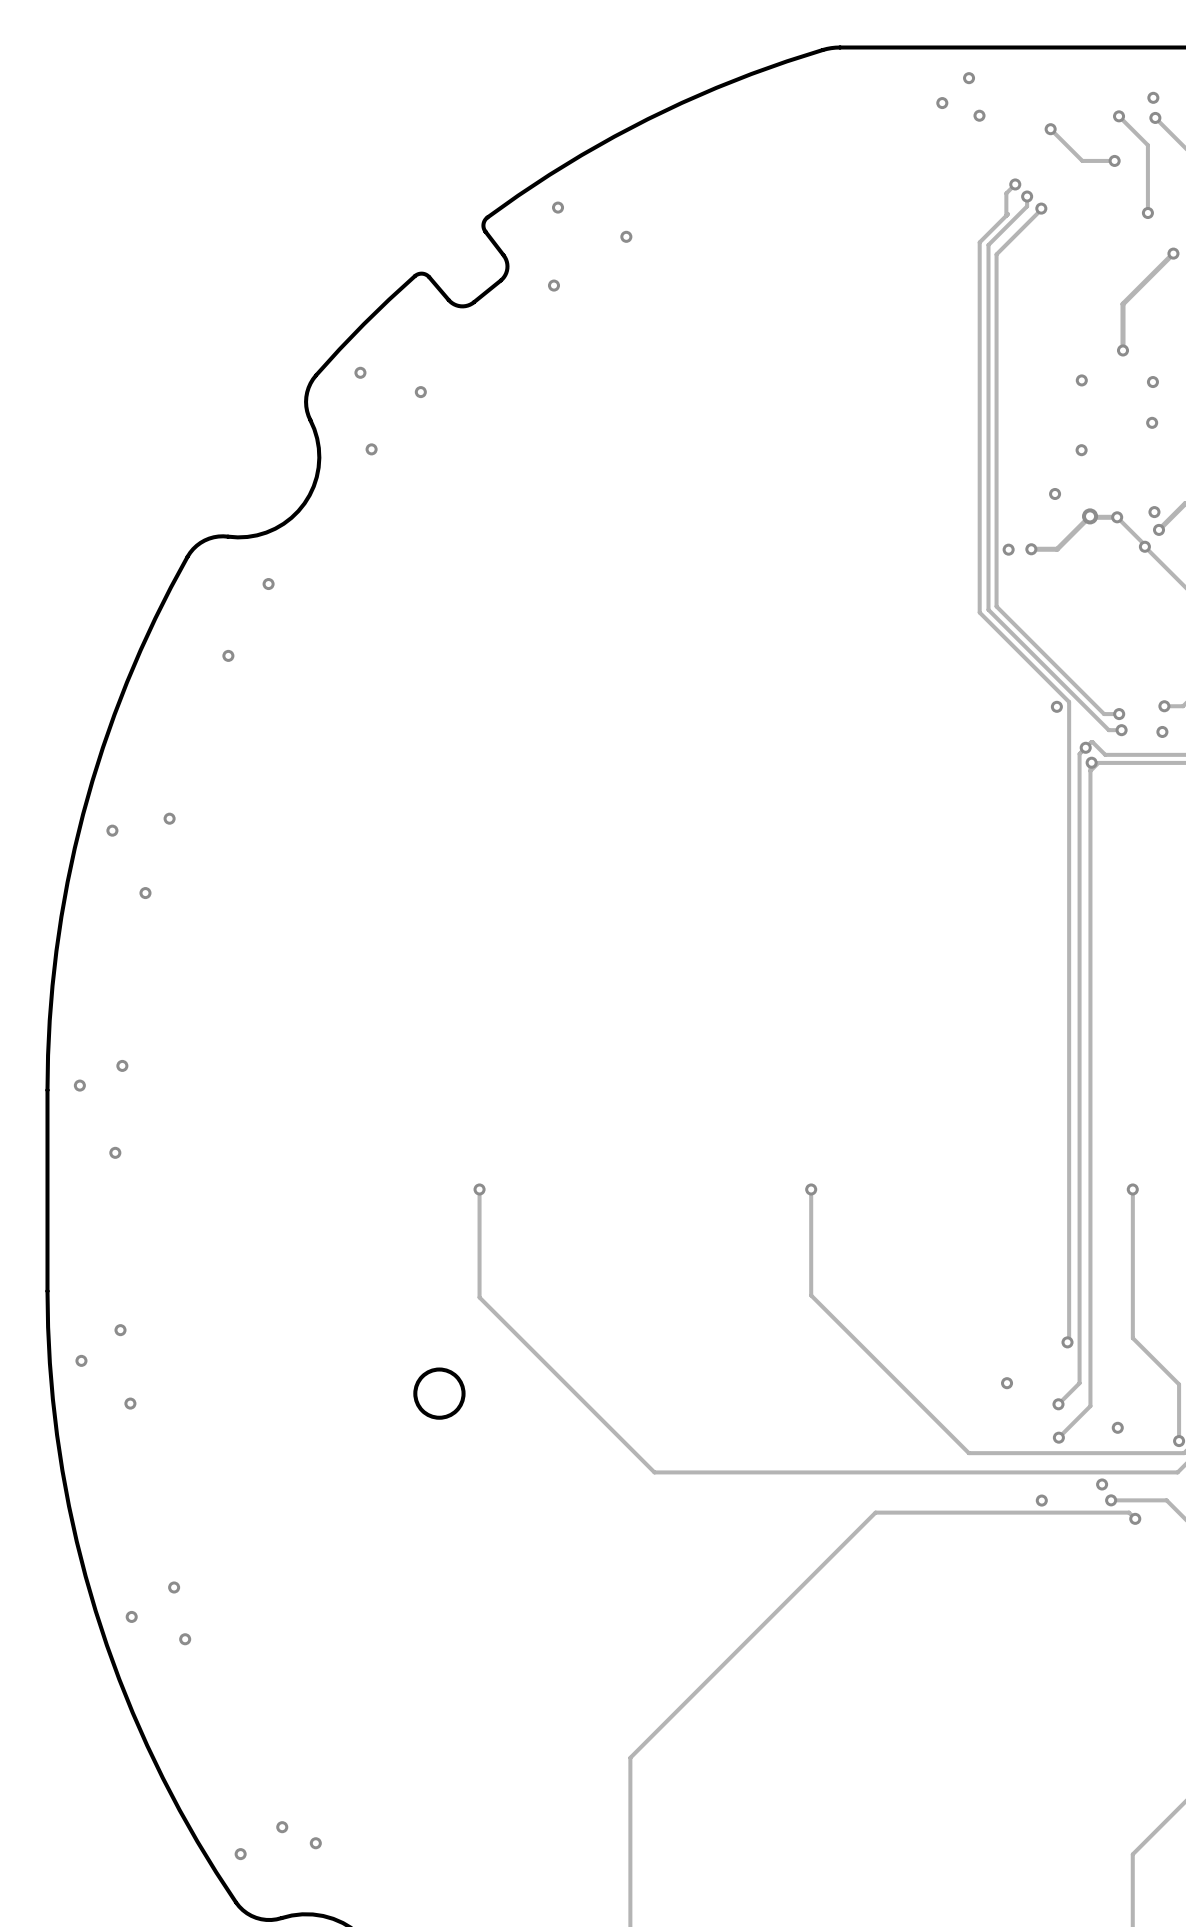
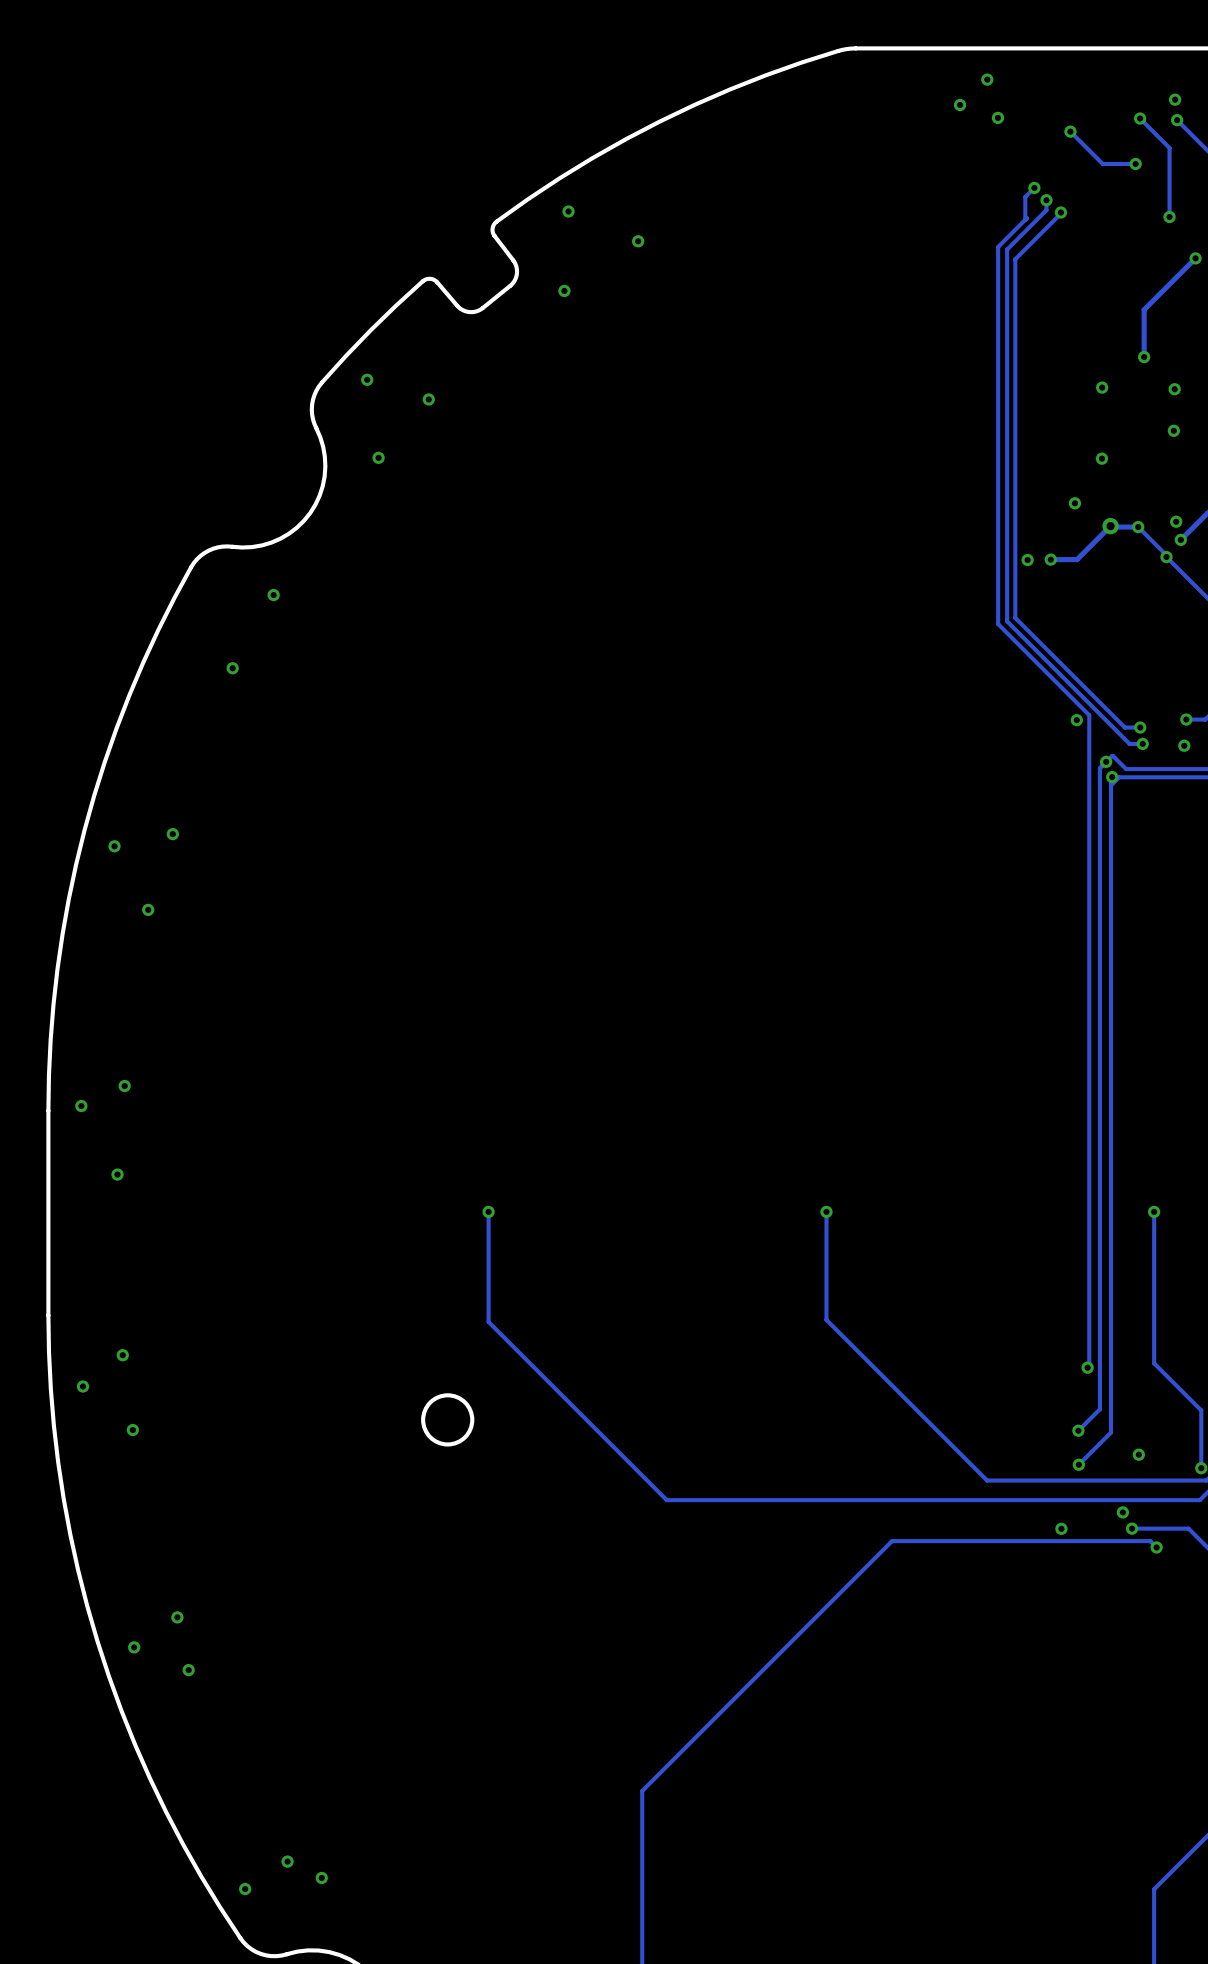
via: (1007, 1383) -> none

